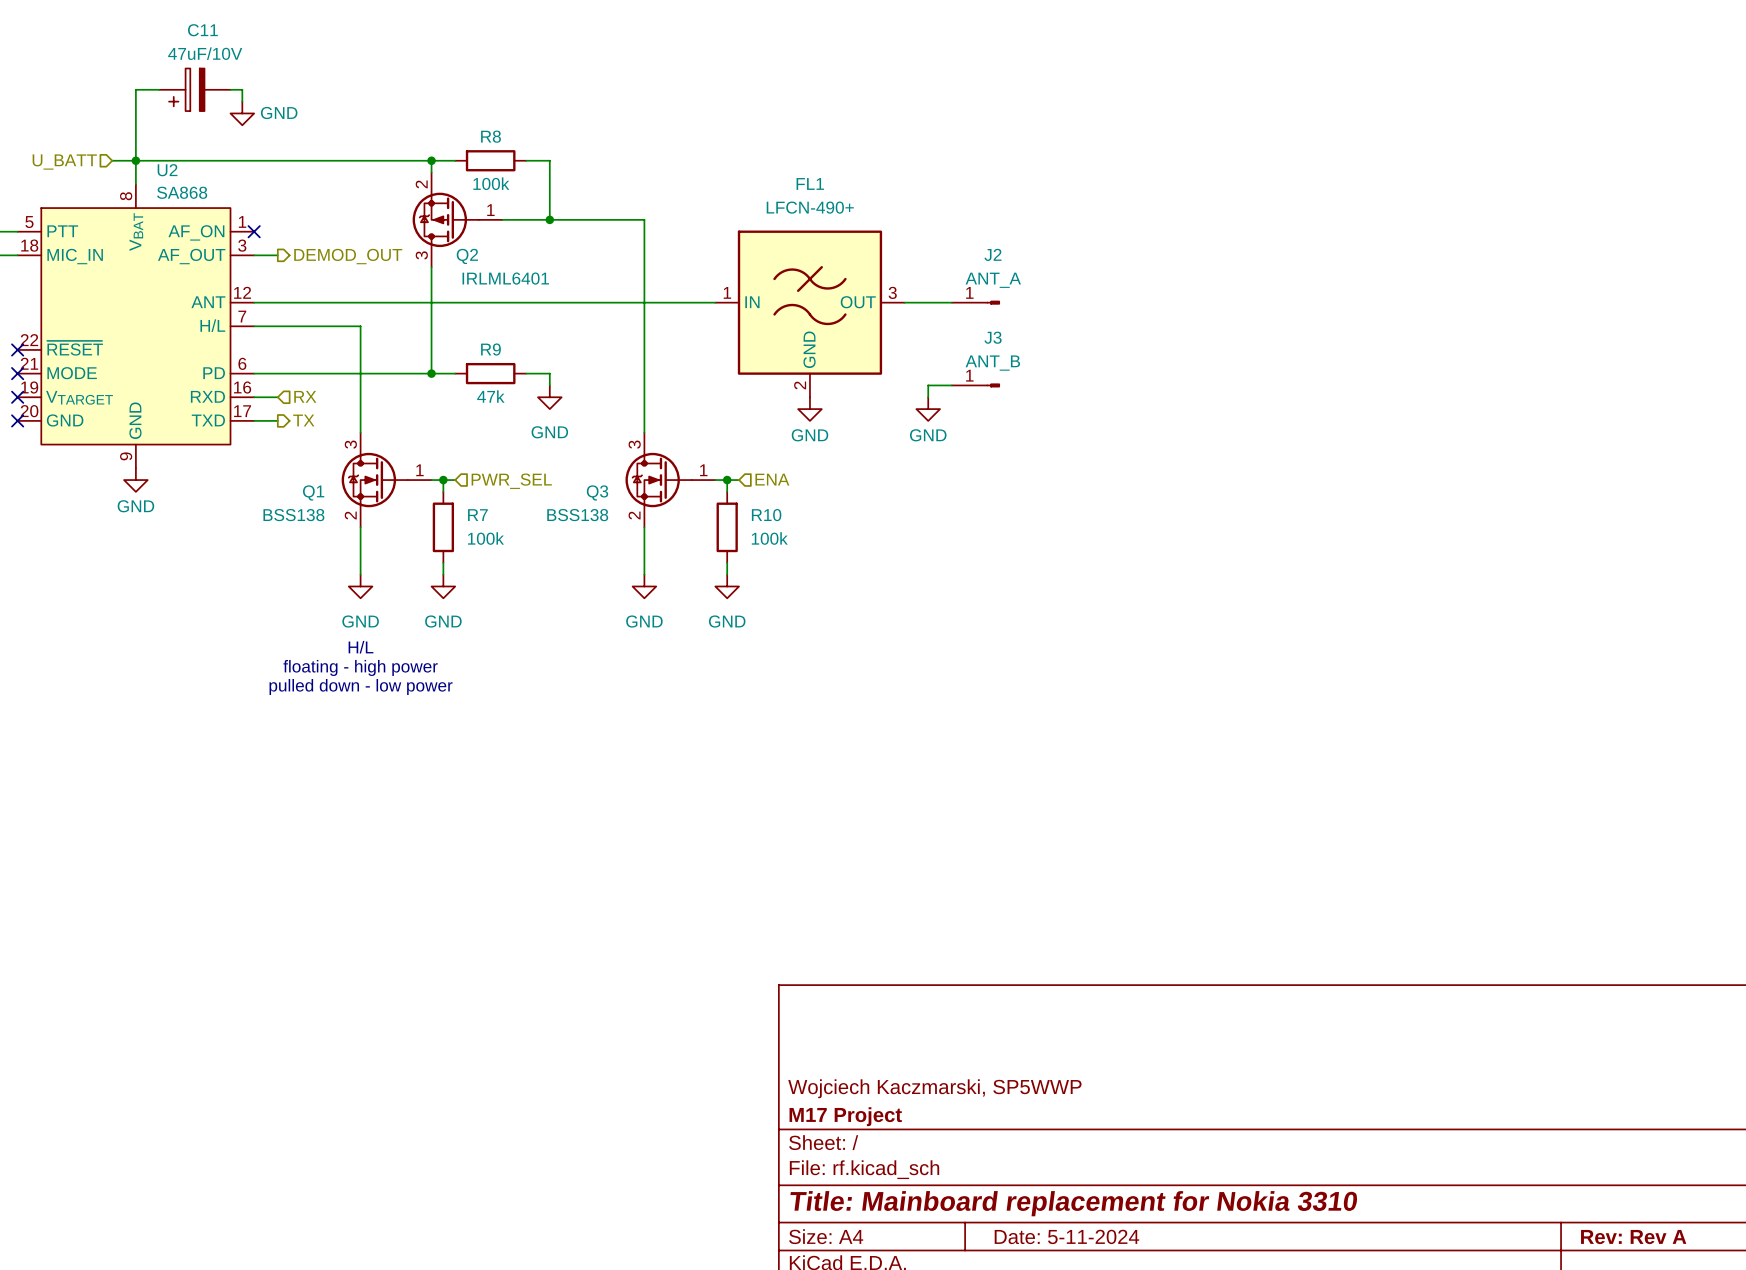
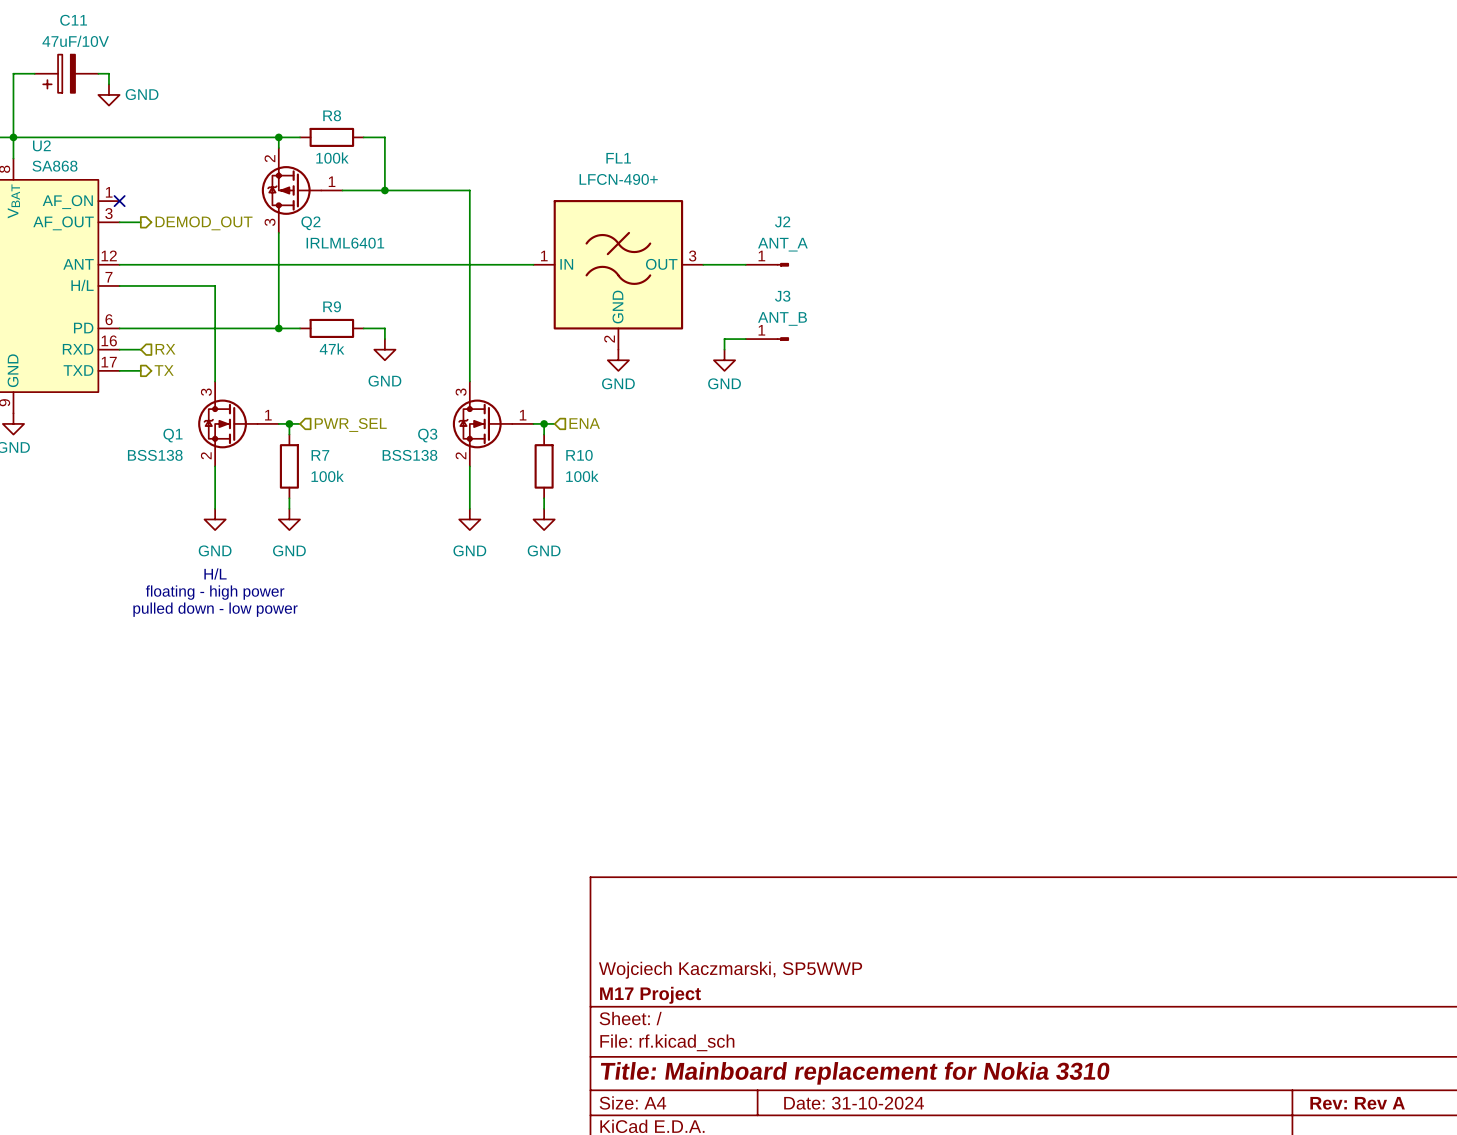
title block: Date: 5-11-2024 (1066, 1236) -> Date: 31-10-2024 (854, 1103)

